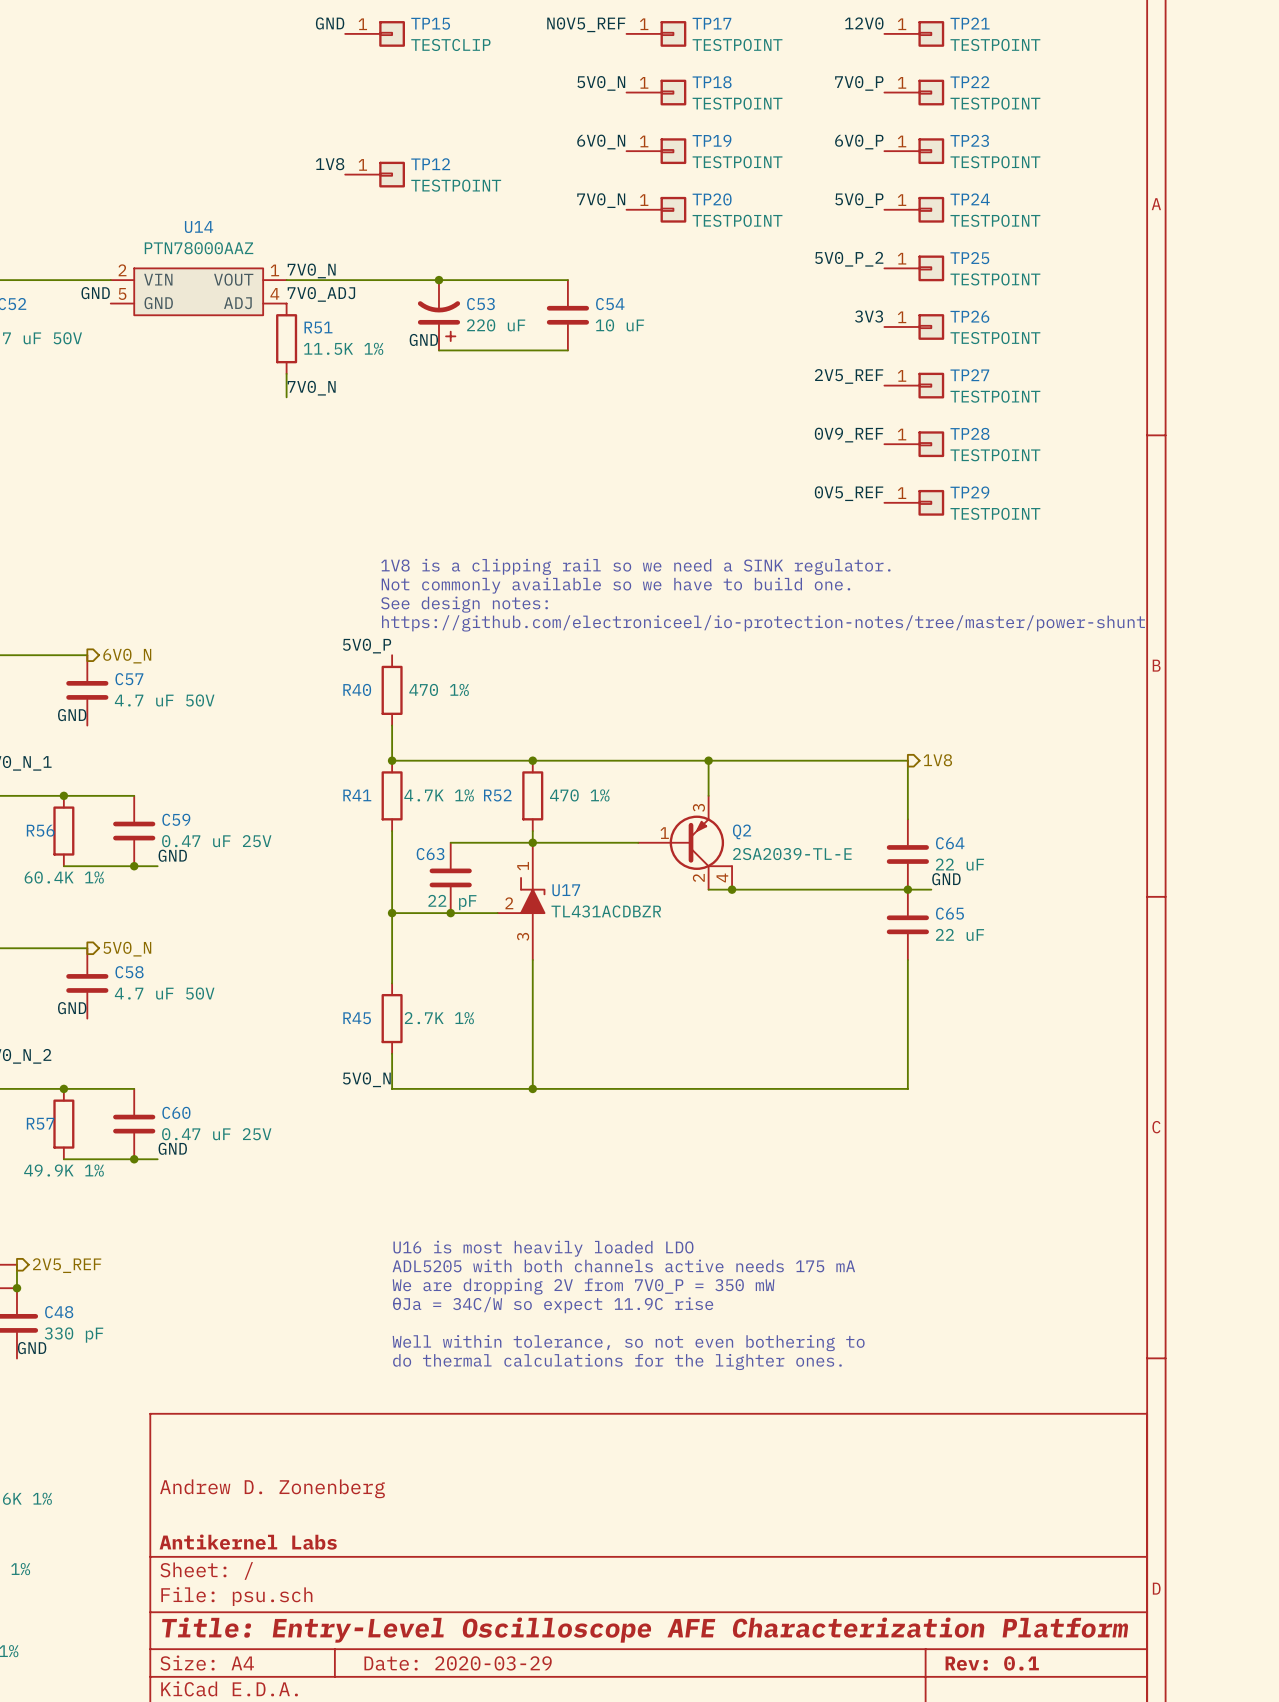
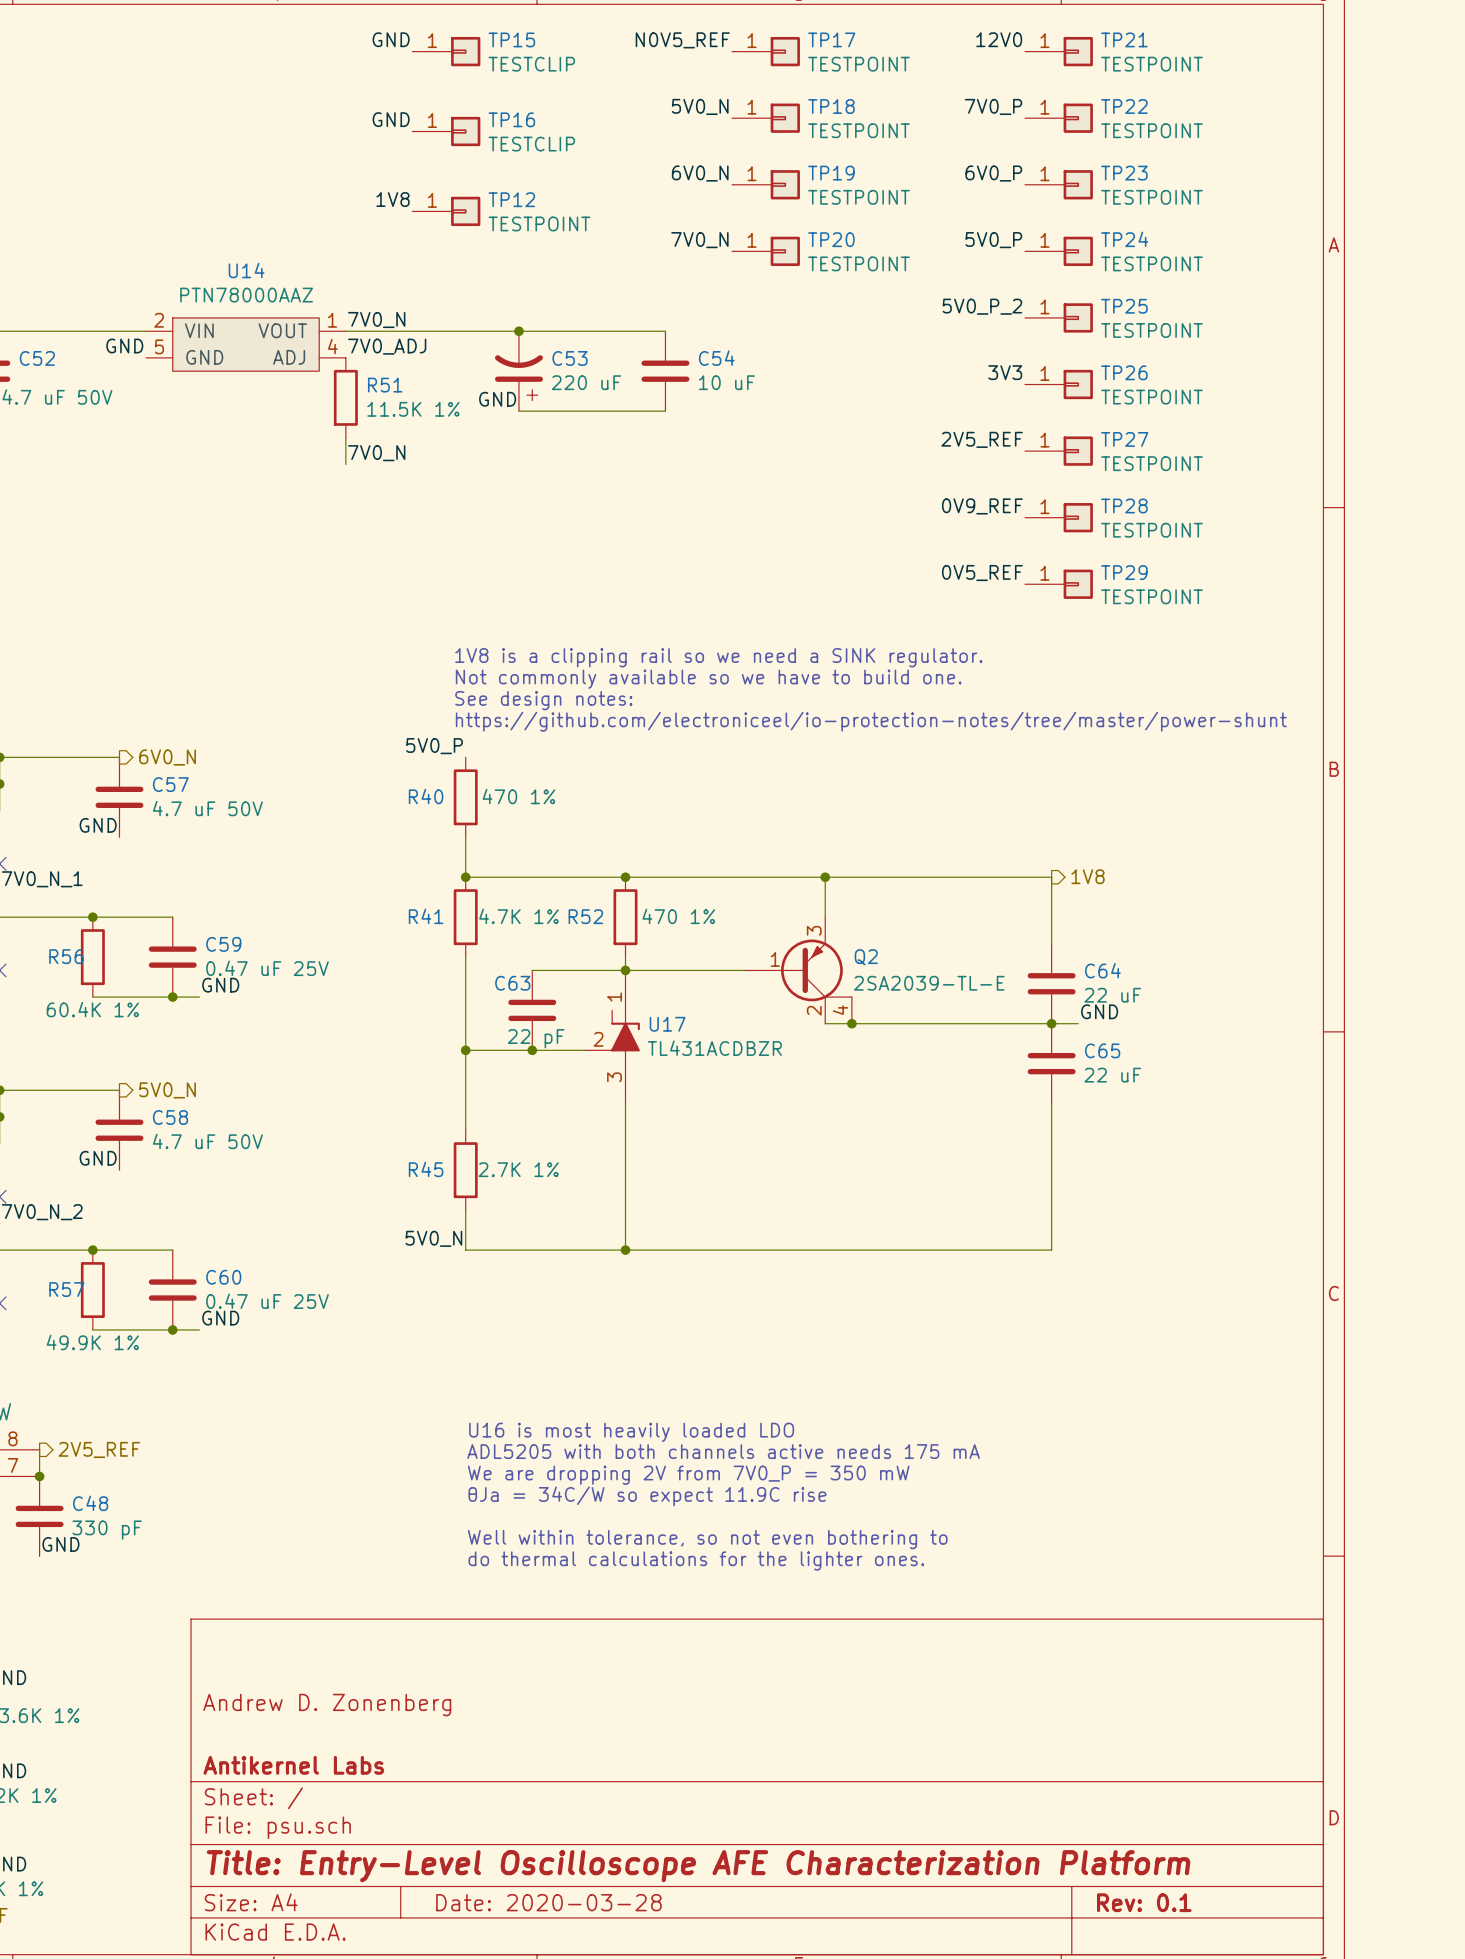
label: none -> GND (391, 119)
TP16: none -> TESTCLIP (446, 131)
title block: Date: 2020-03-29 (458, 1663) -> Date: 2020-03-28 (548, 1902)

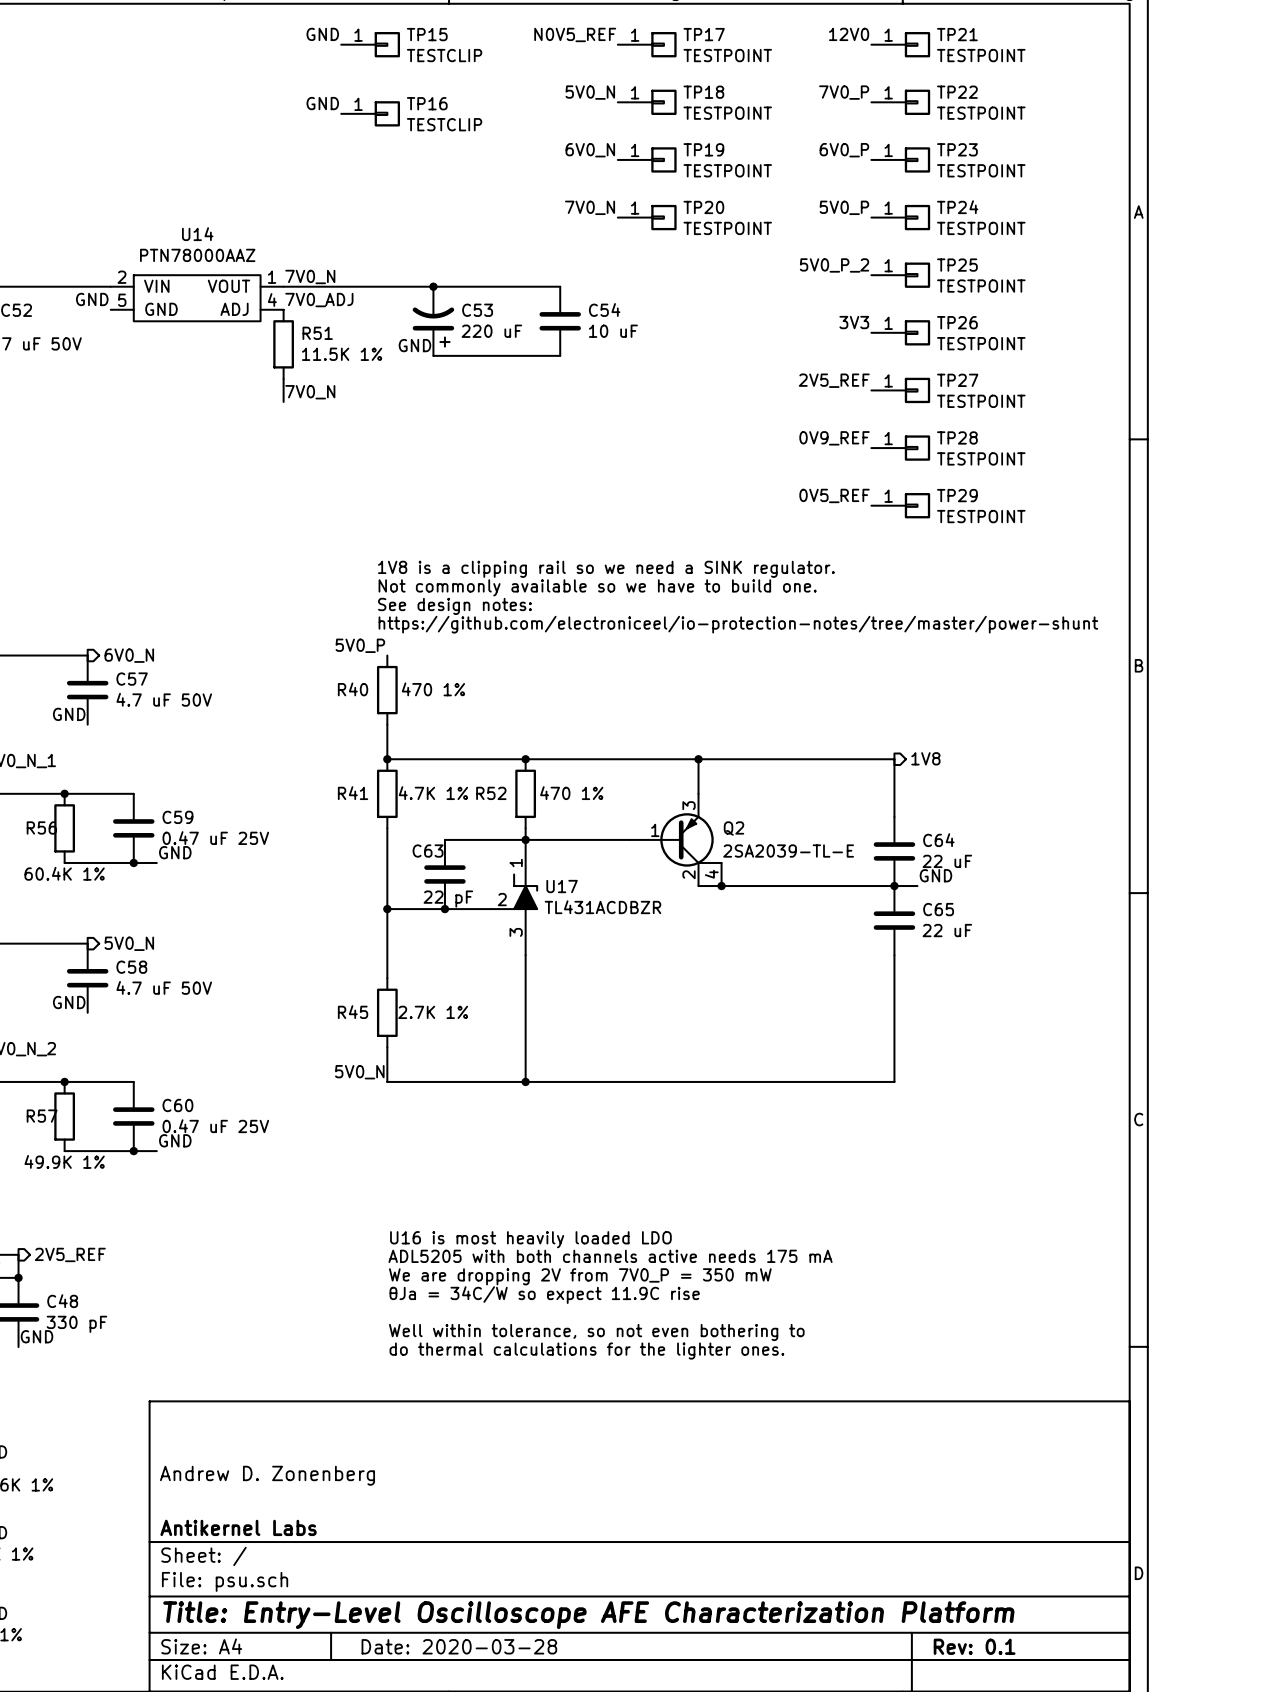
label: 1V8 (393, 199) -> none
TP12: TESTPOINT (446, 211) -> none

